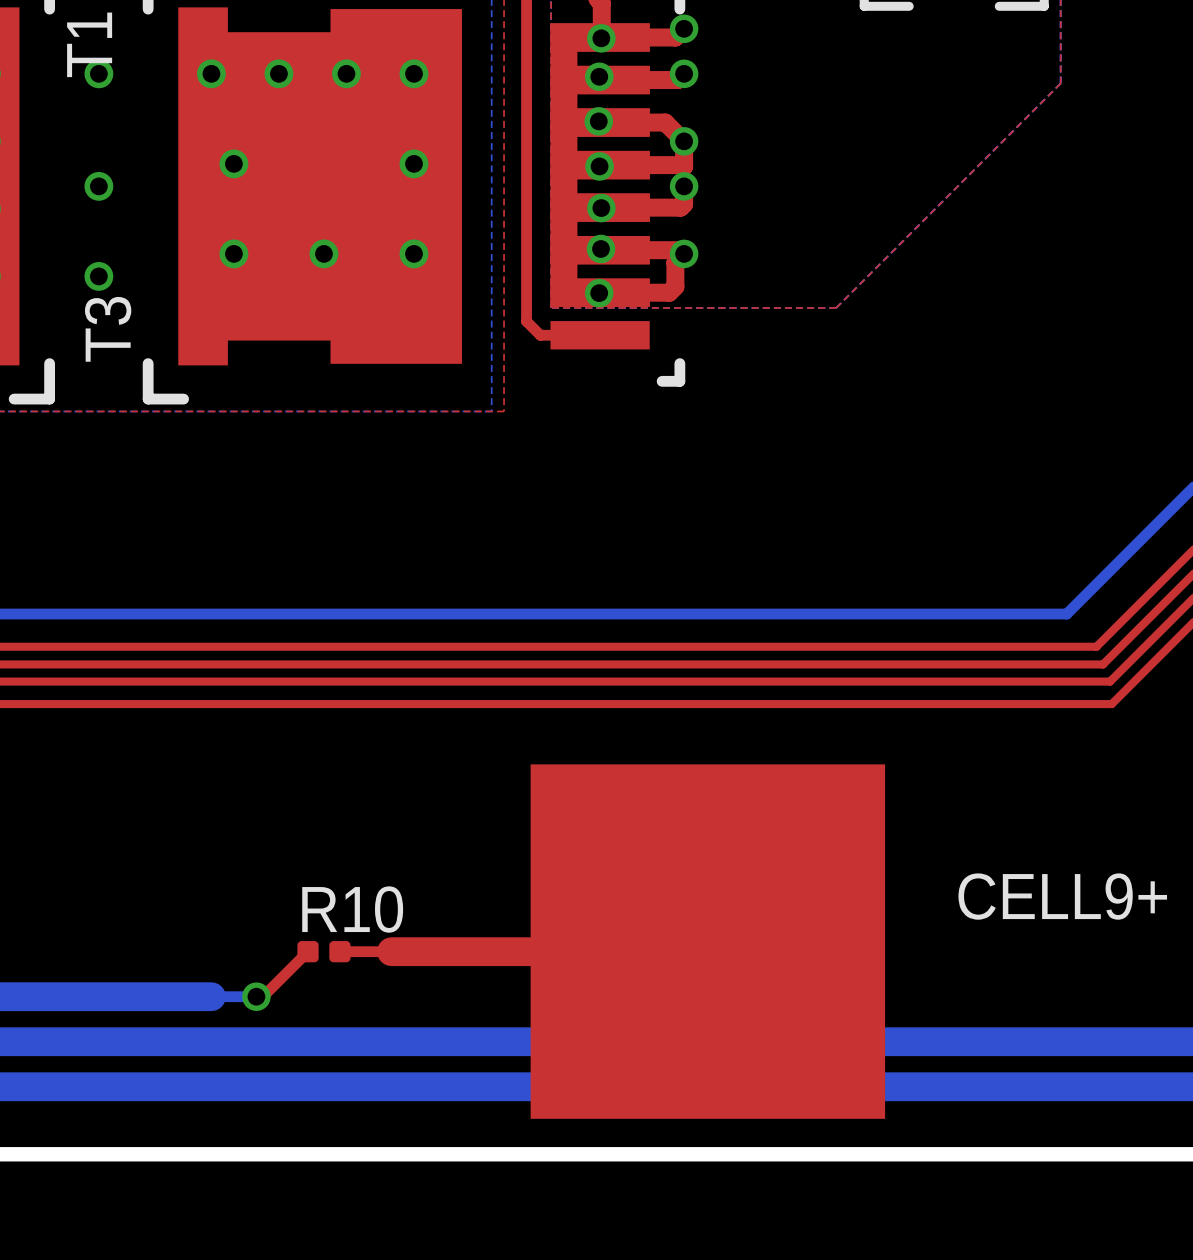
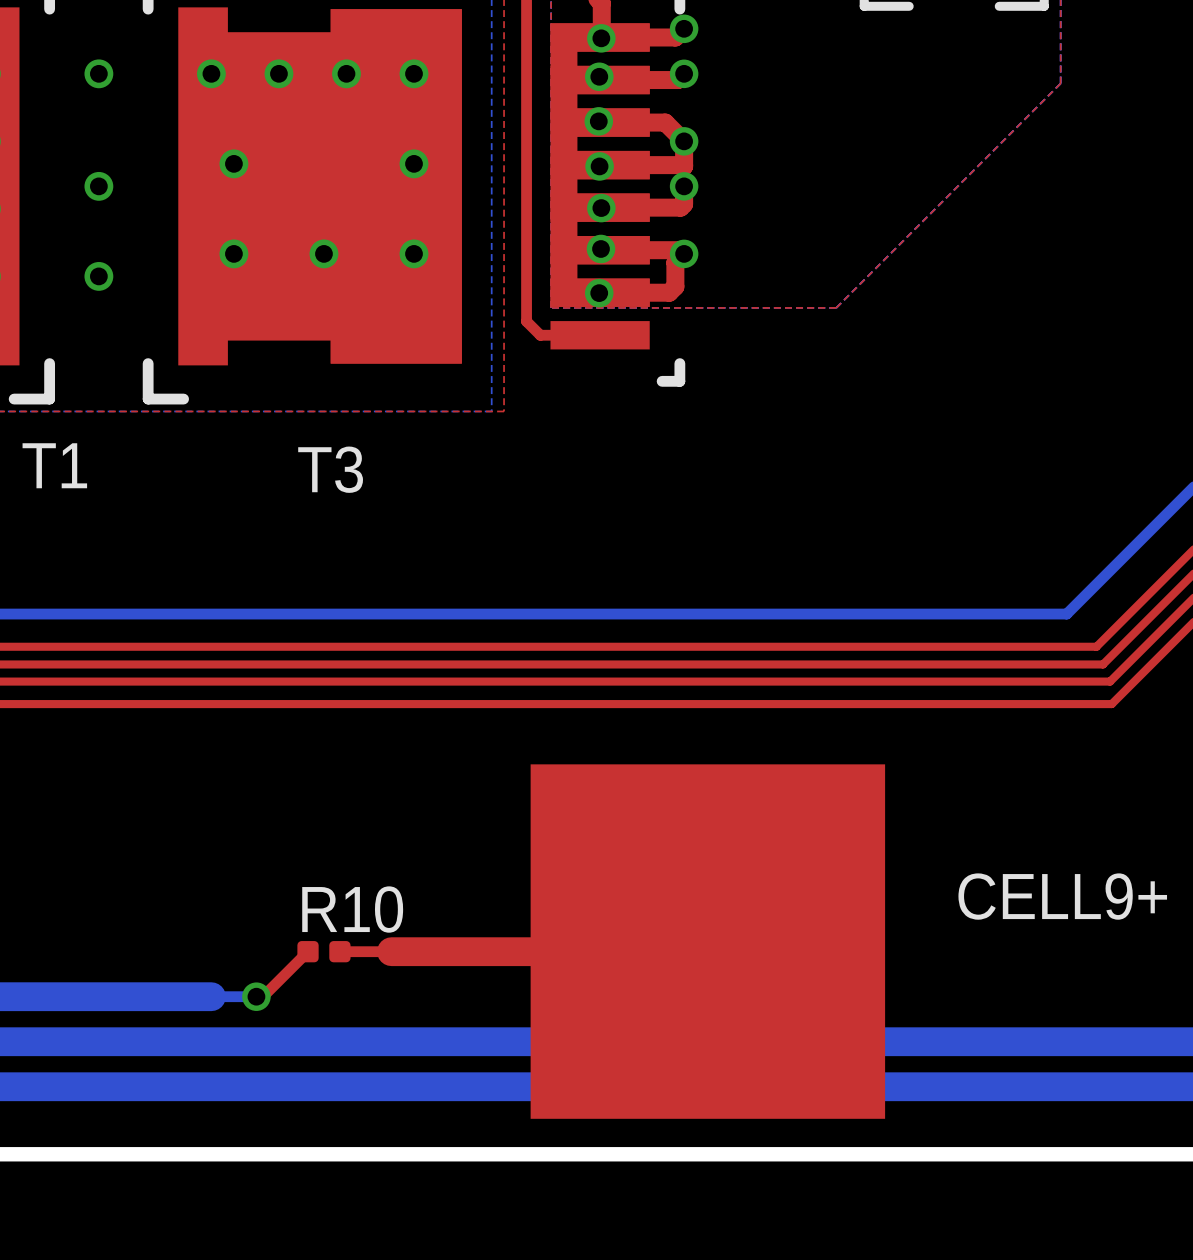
T1 name rotation: 0° (89, 44) -> 90° clockwise (54, 465)
T1 name position: T1 (89, 44) -> T1 (54, 465)
T3 name rotation: 0° (108, 329) -> 90° clockwise (330, 469)
T3 name position: T3 (108, 329) -> T3 (330, 469)

